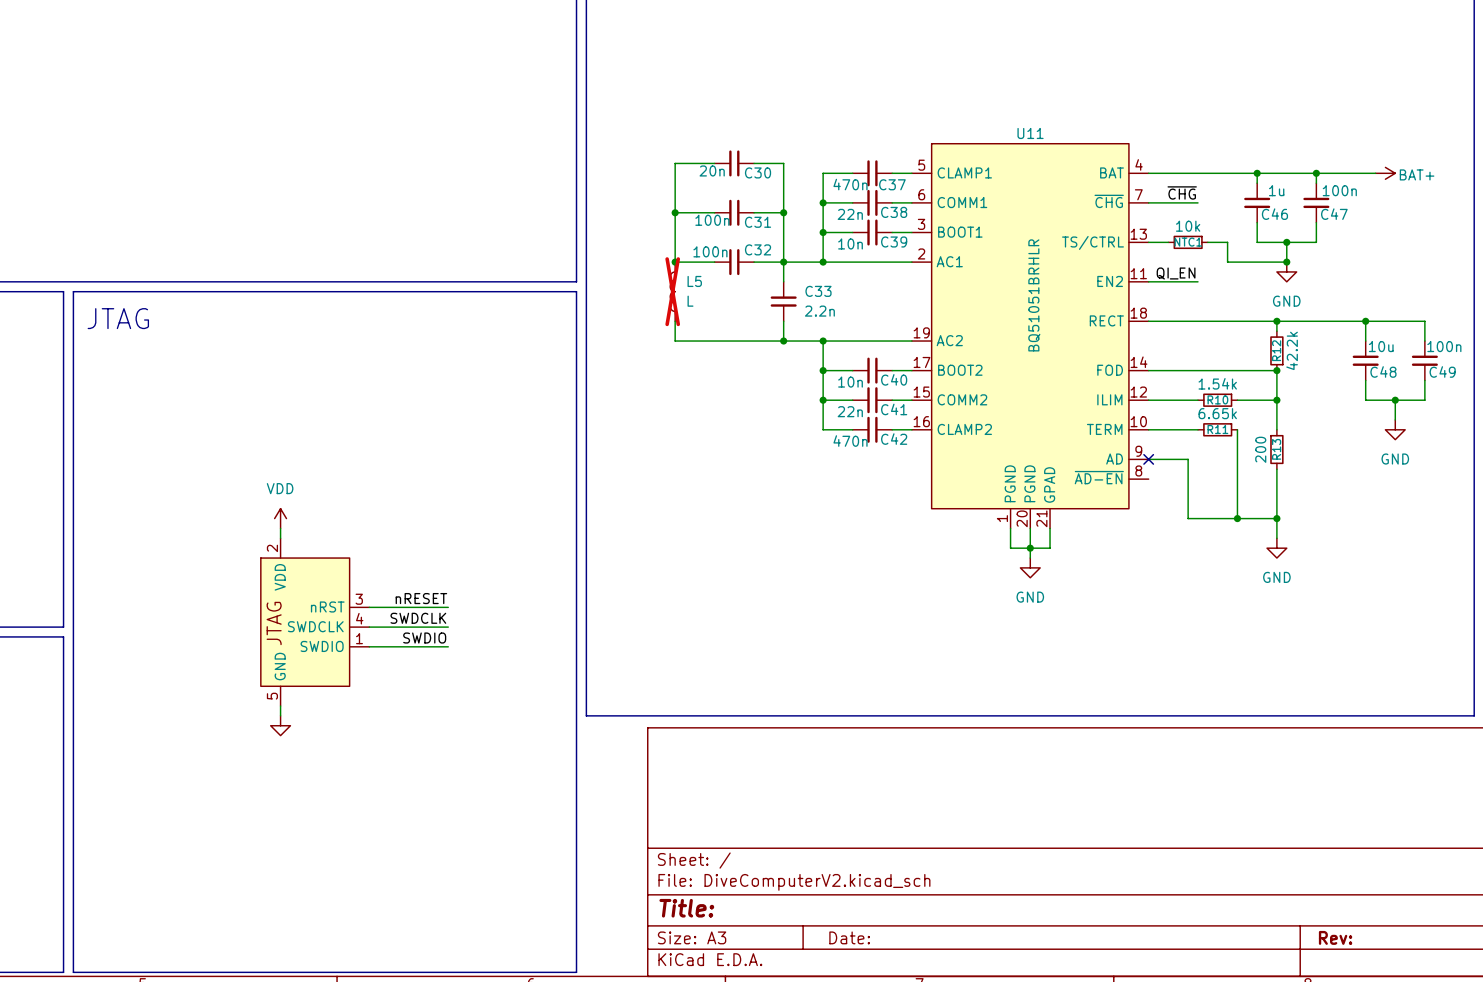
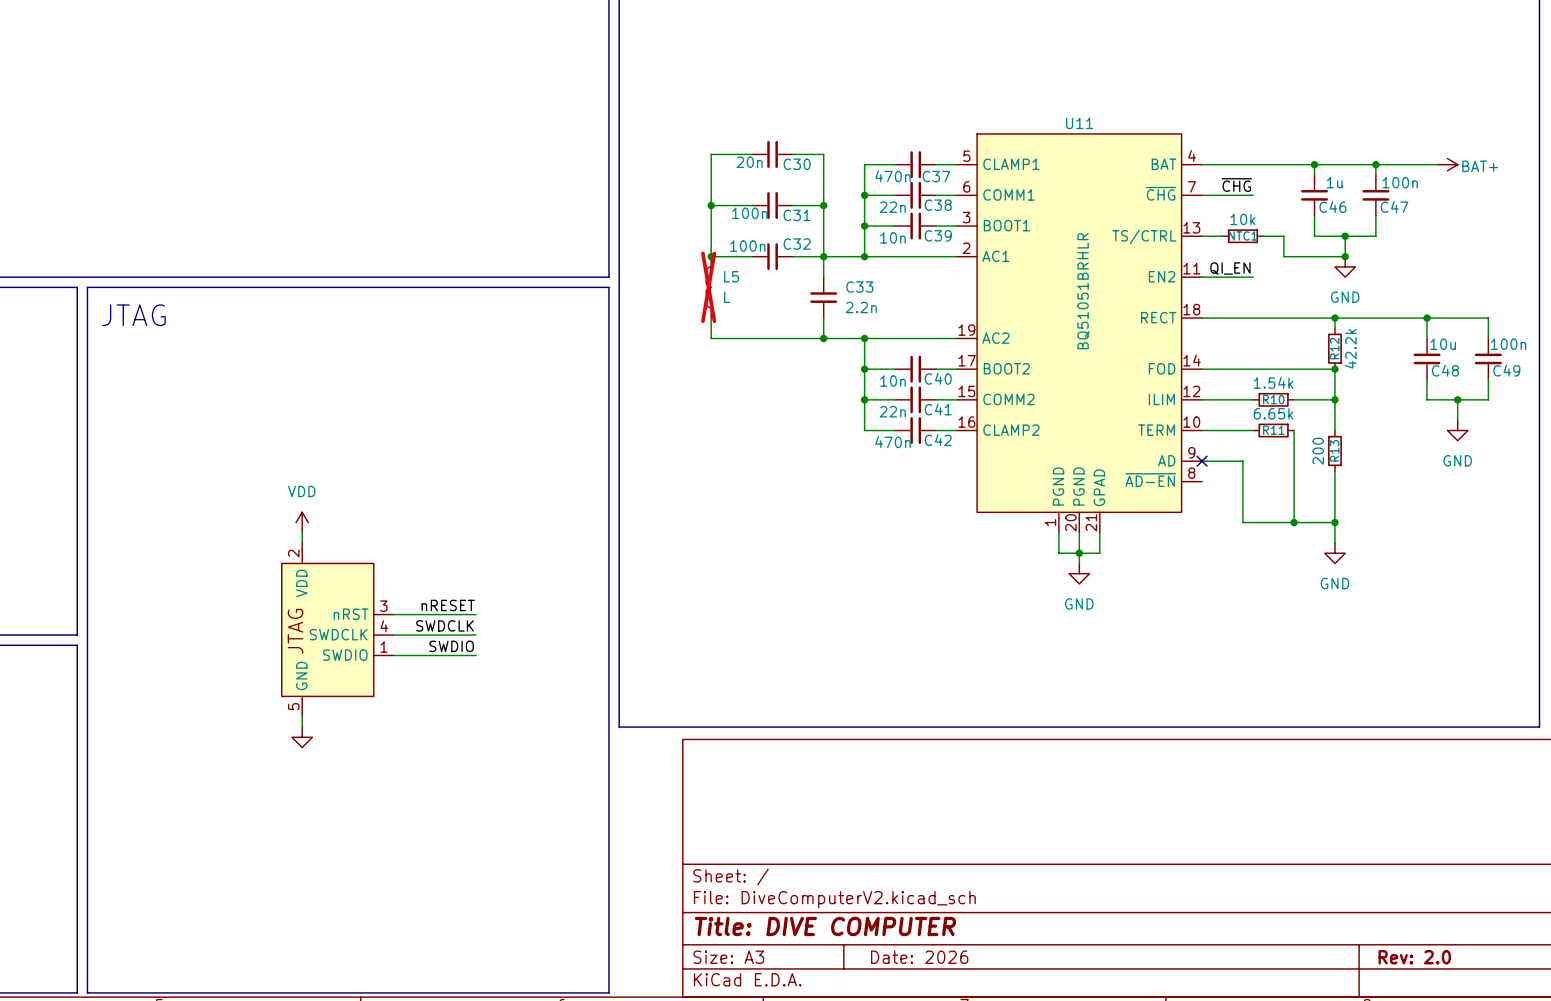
title block: Title: (686, 908) -> Title: DIVE COMPUTER (825, 926)
title block: Date: (849, 937) -> Date: 2026 (919, 957)
title block: Rev: (1335, 937) -> Rev: 2.0 (1414, 957)

